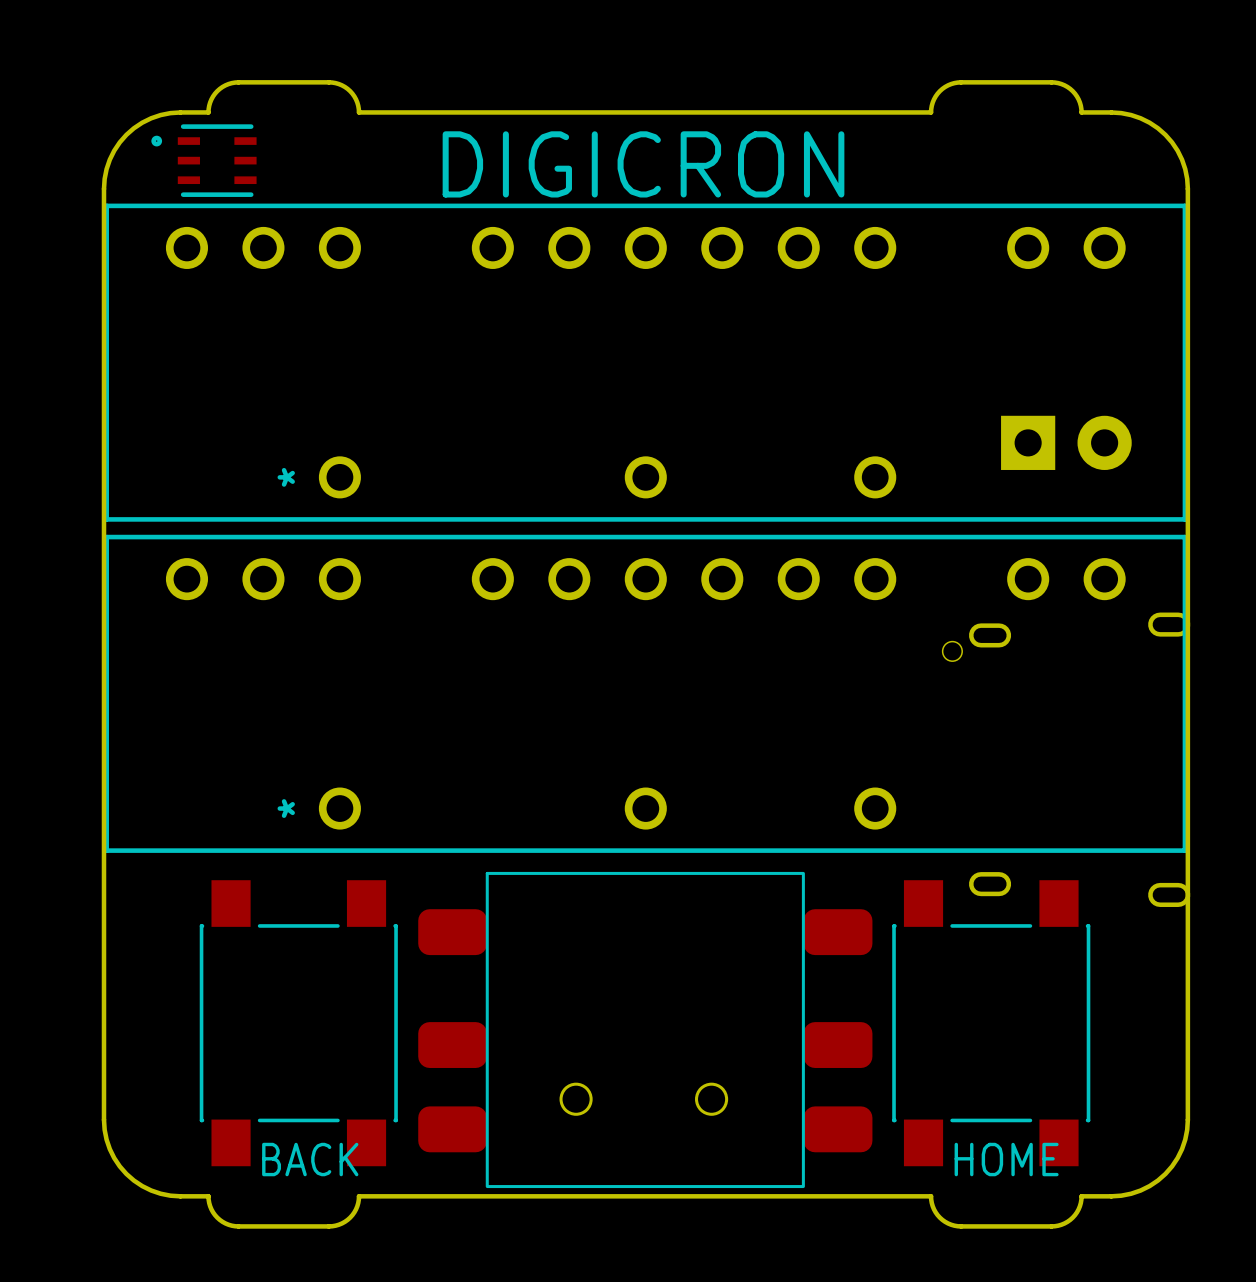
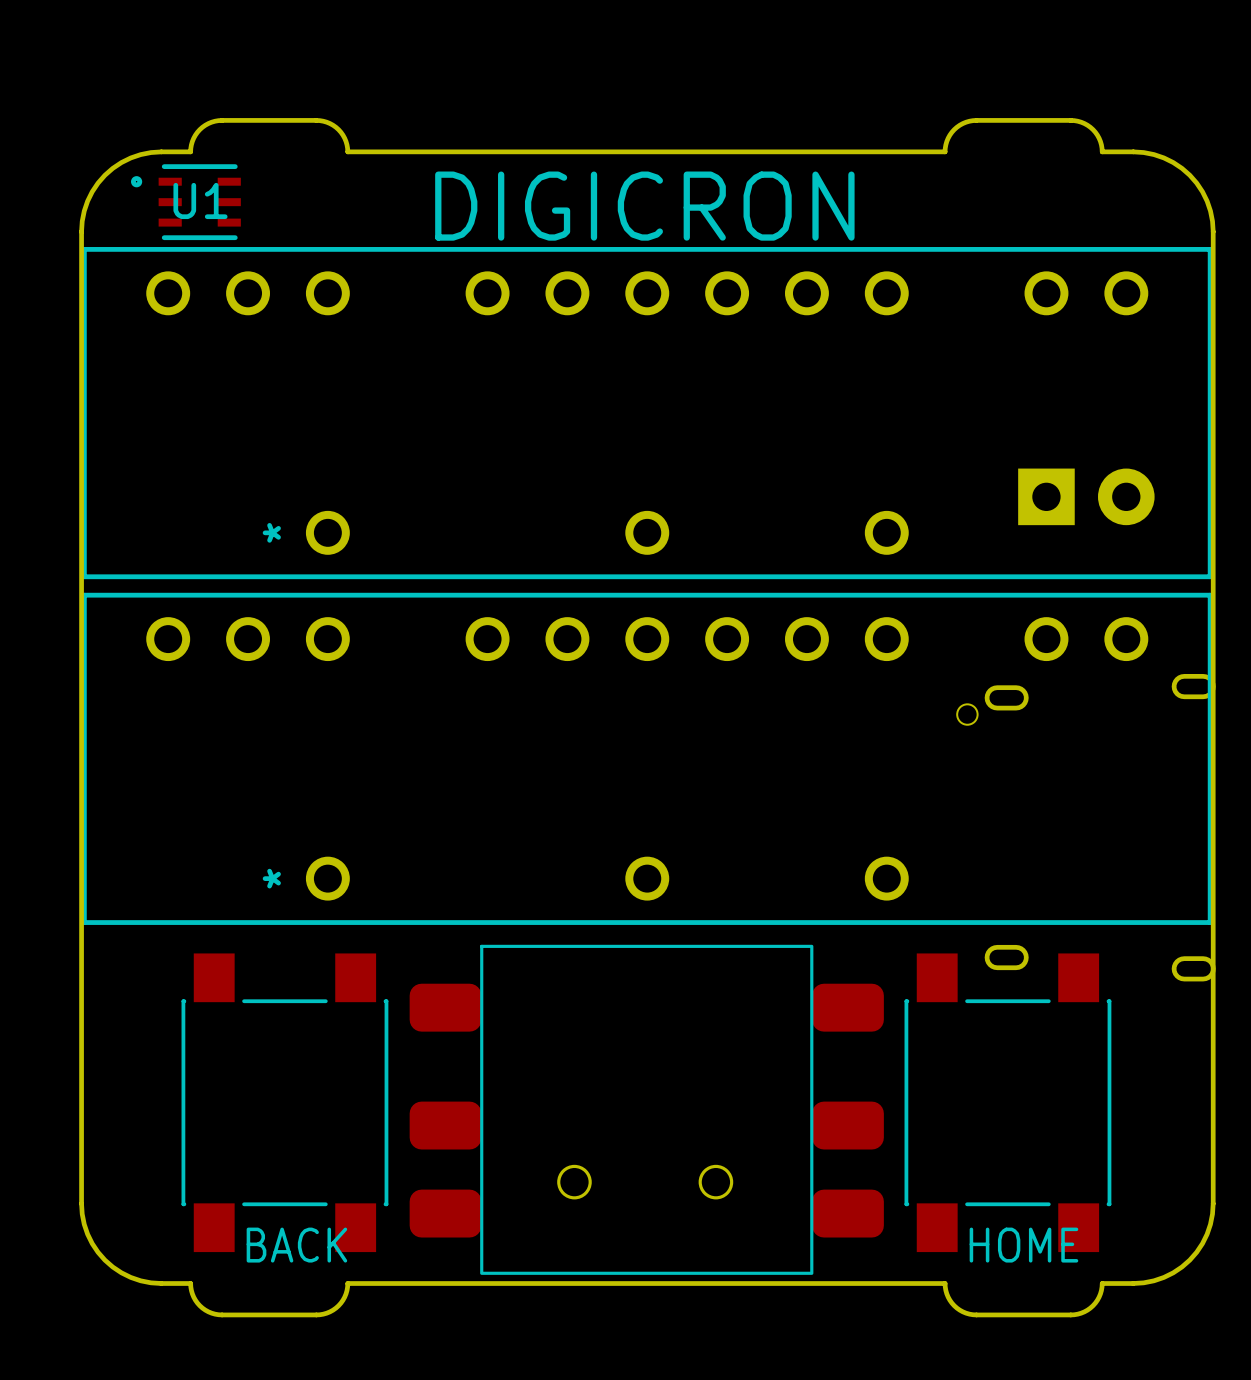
U1 name: none -> U1 (200, 200)

